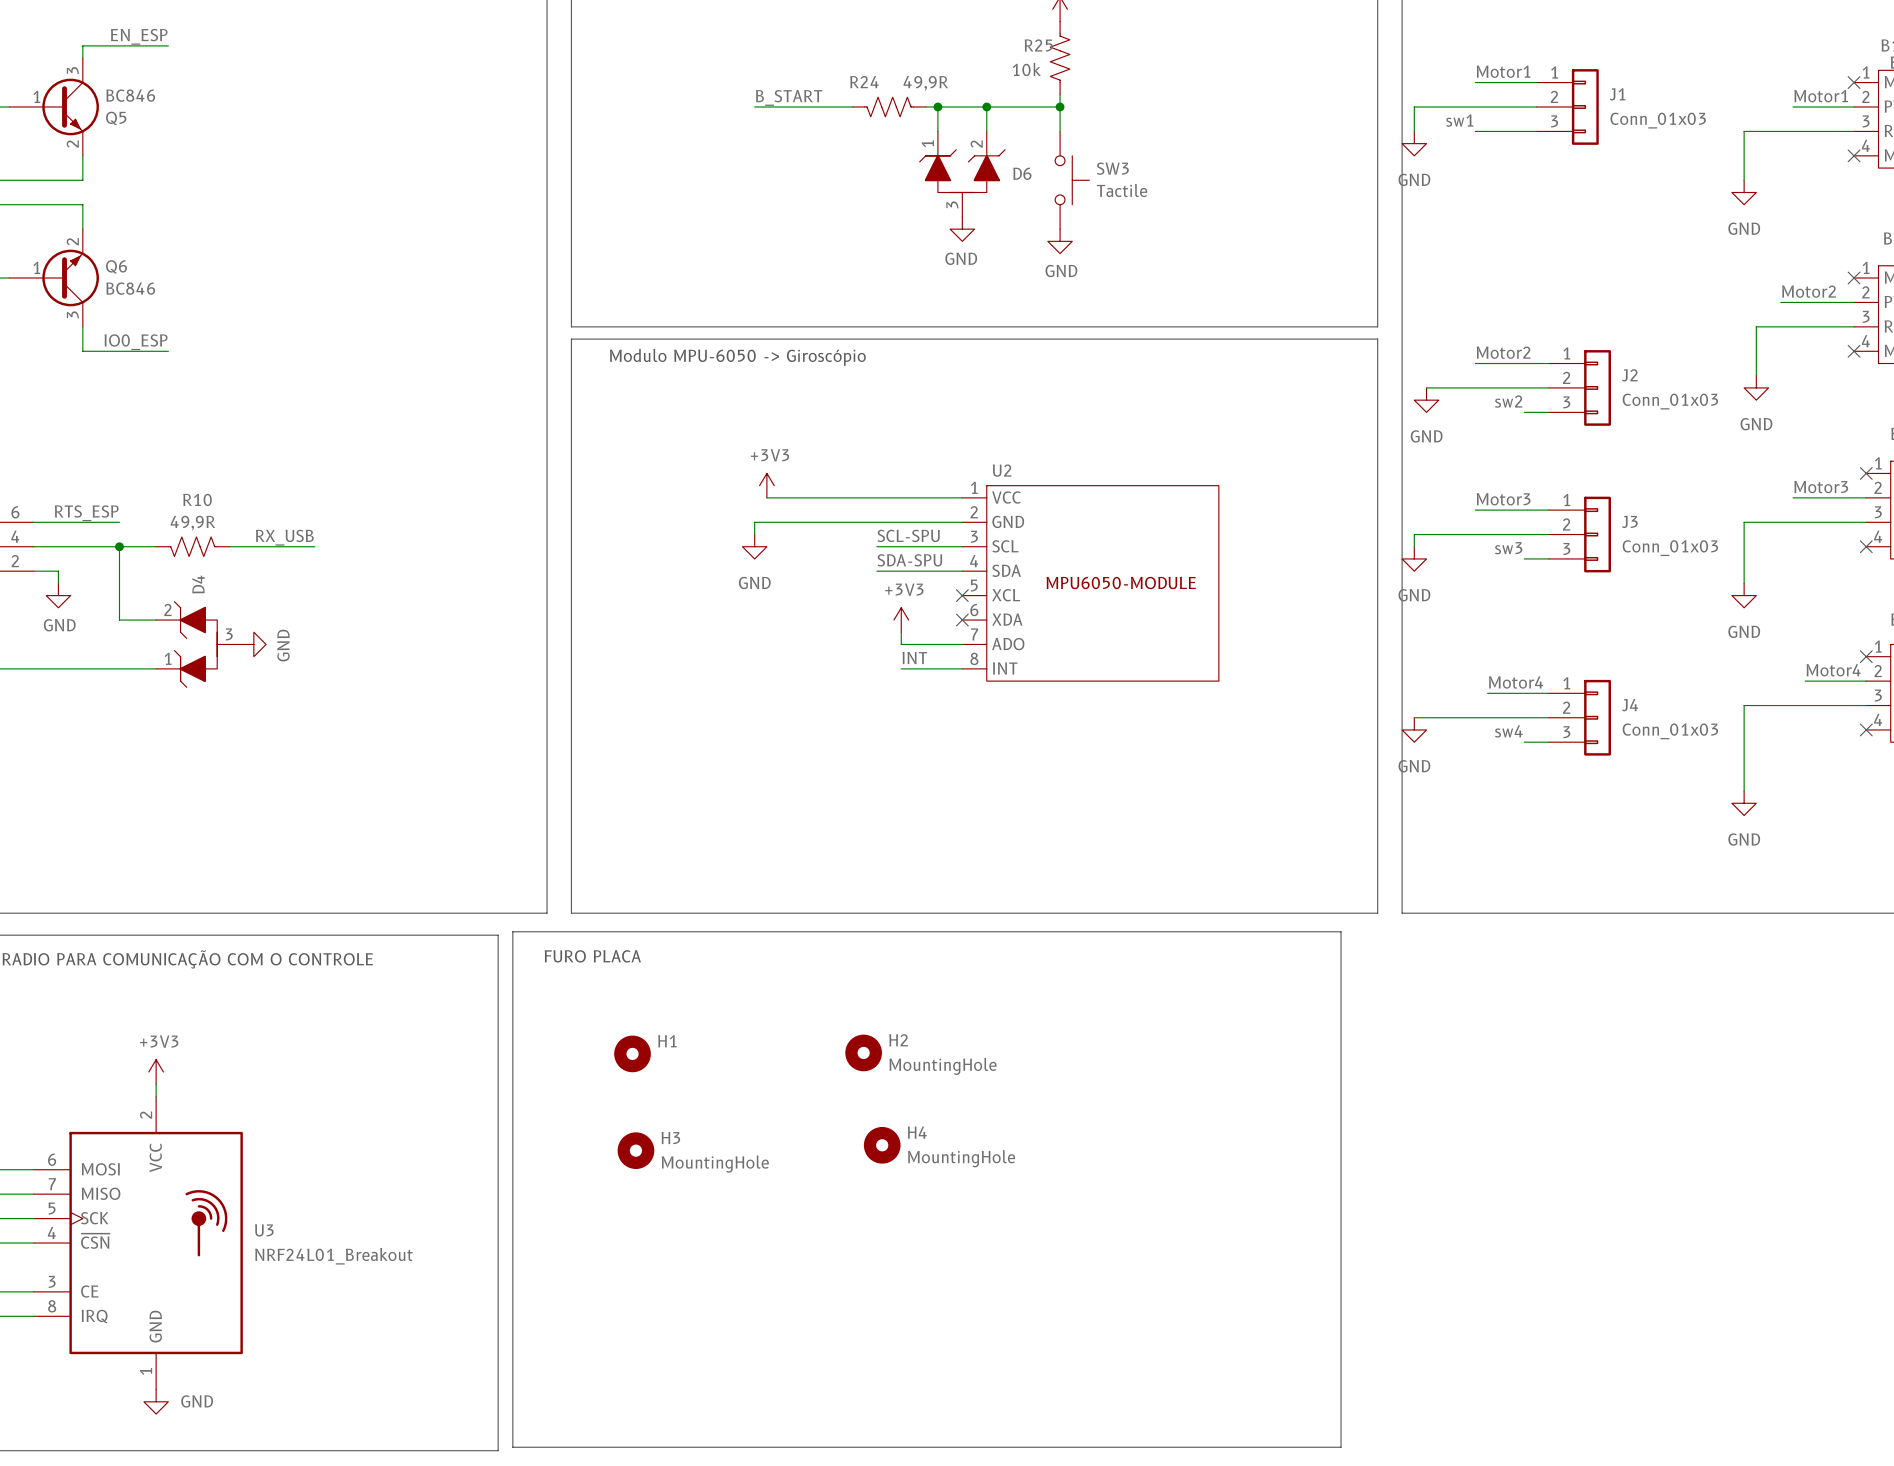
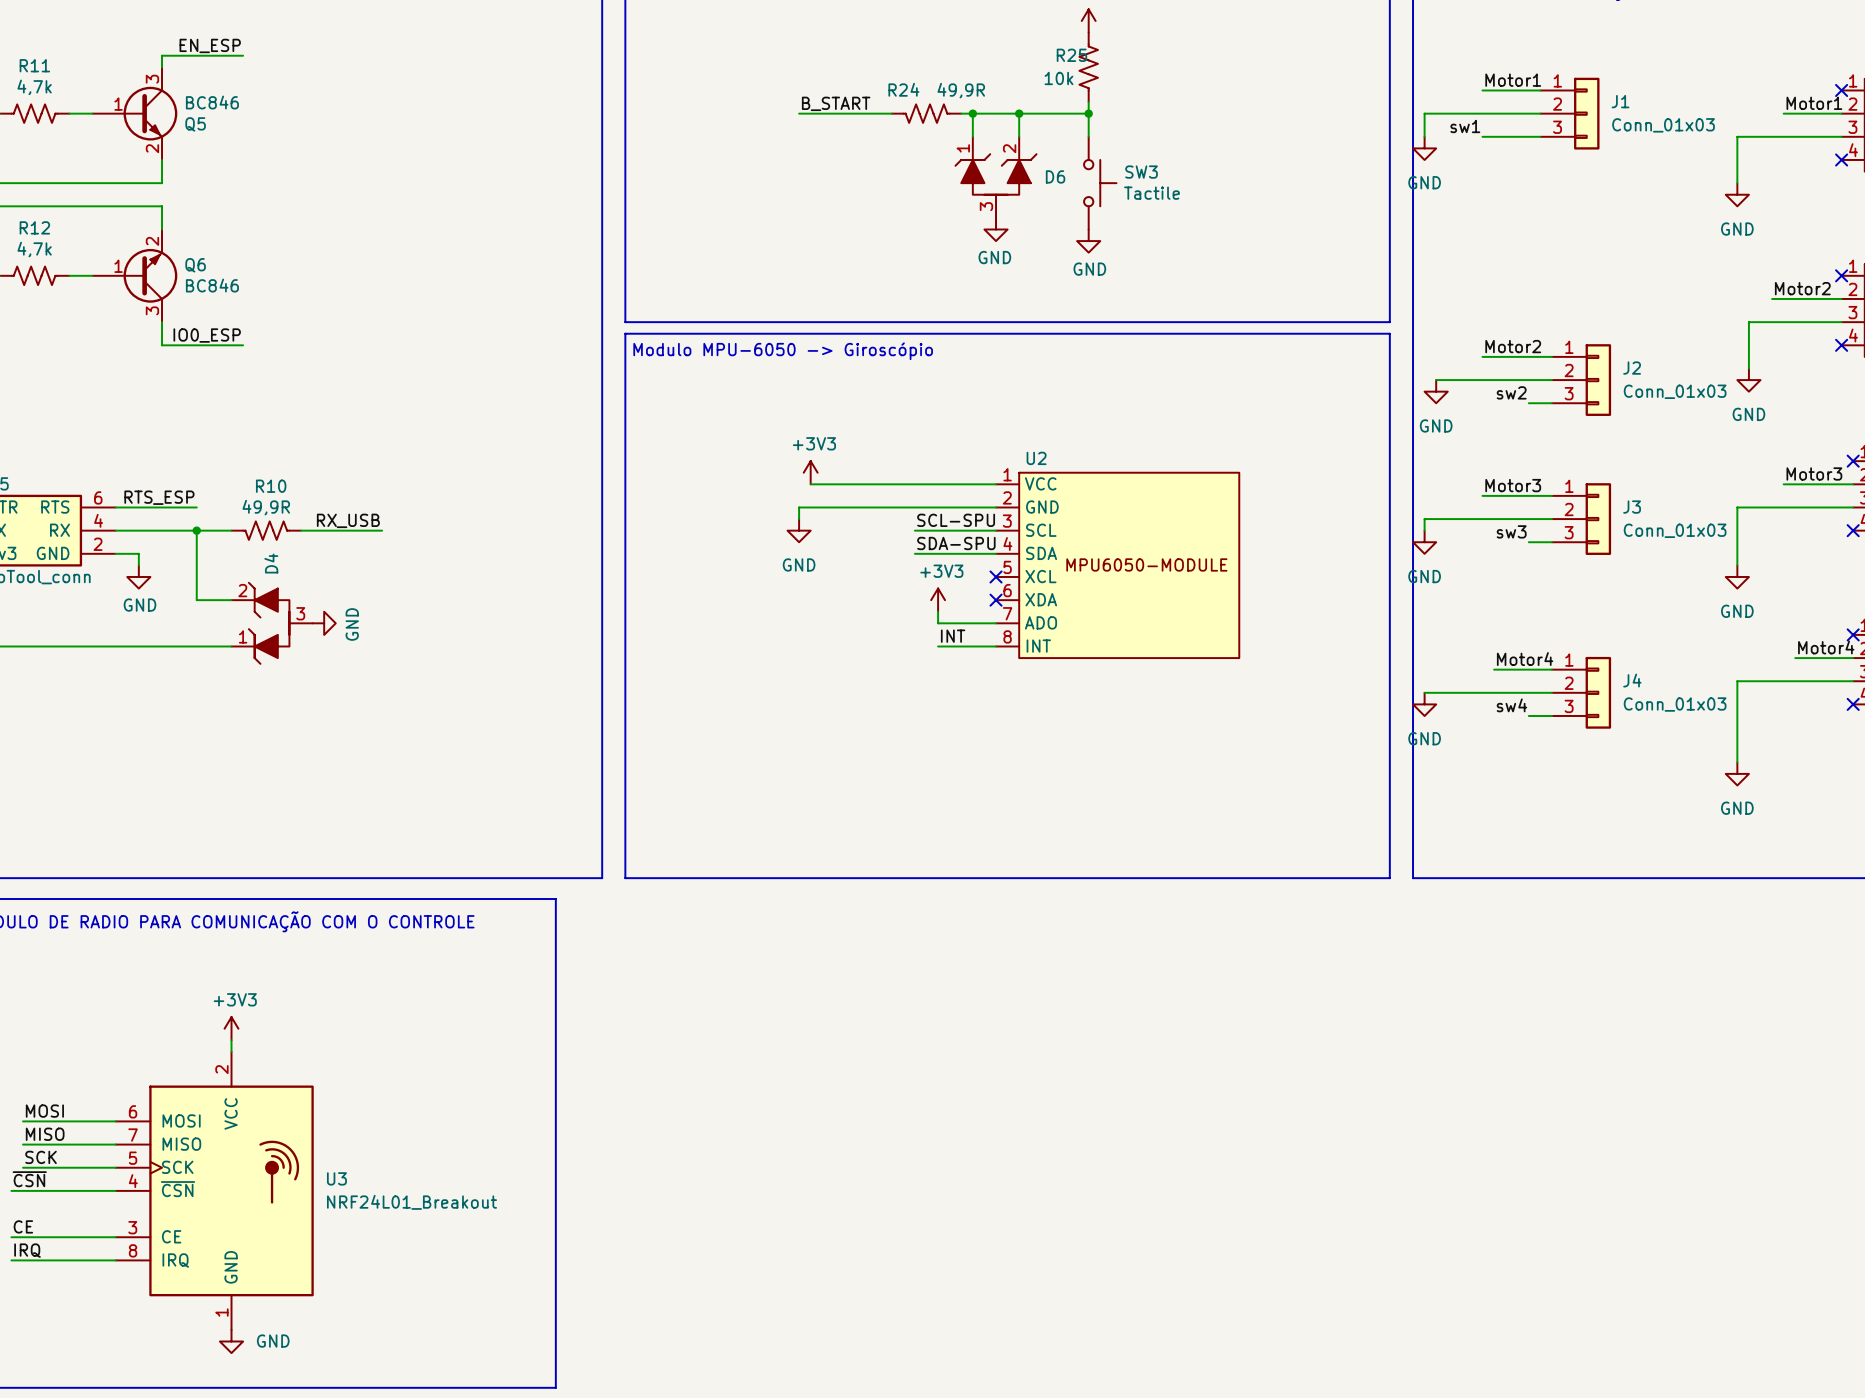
line: (512, 931) (1341, 931) (1341, 1447) (512, 1447) (512, 931) -> none
text: FURO PLACA (592, 956) -> none
H2: MountingHole (863, 1052) -> none
H1: (632, 1053) -> none
H4: MountingHole (882, 1145) -> none
H3: MountingHole (635, 1150) -> none

